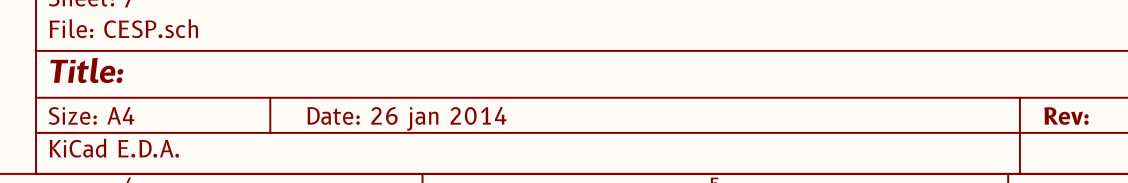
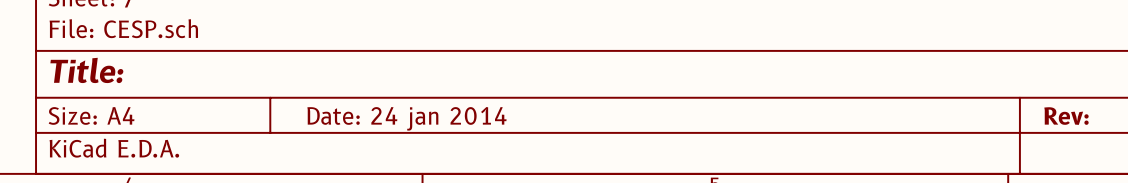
title block: Date: 26 jan 2014 (406, 118) -> Date: 24 jan 2014 (406, 118)

